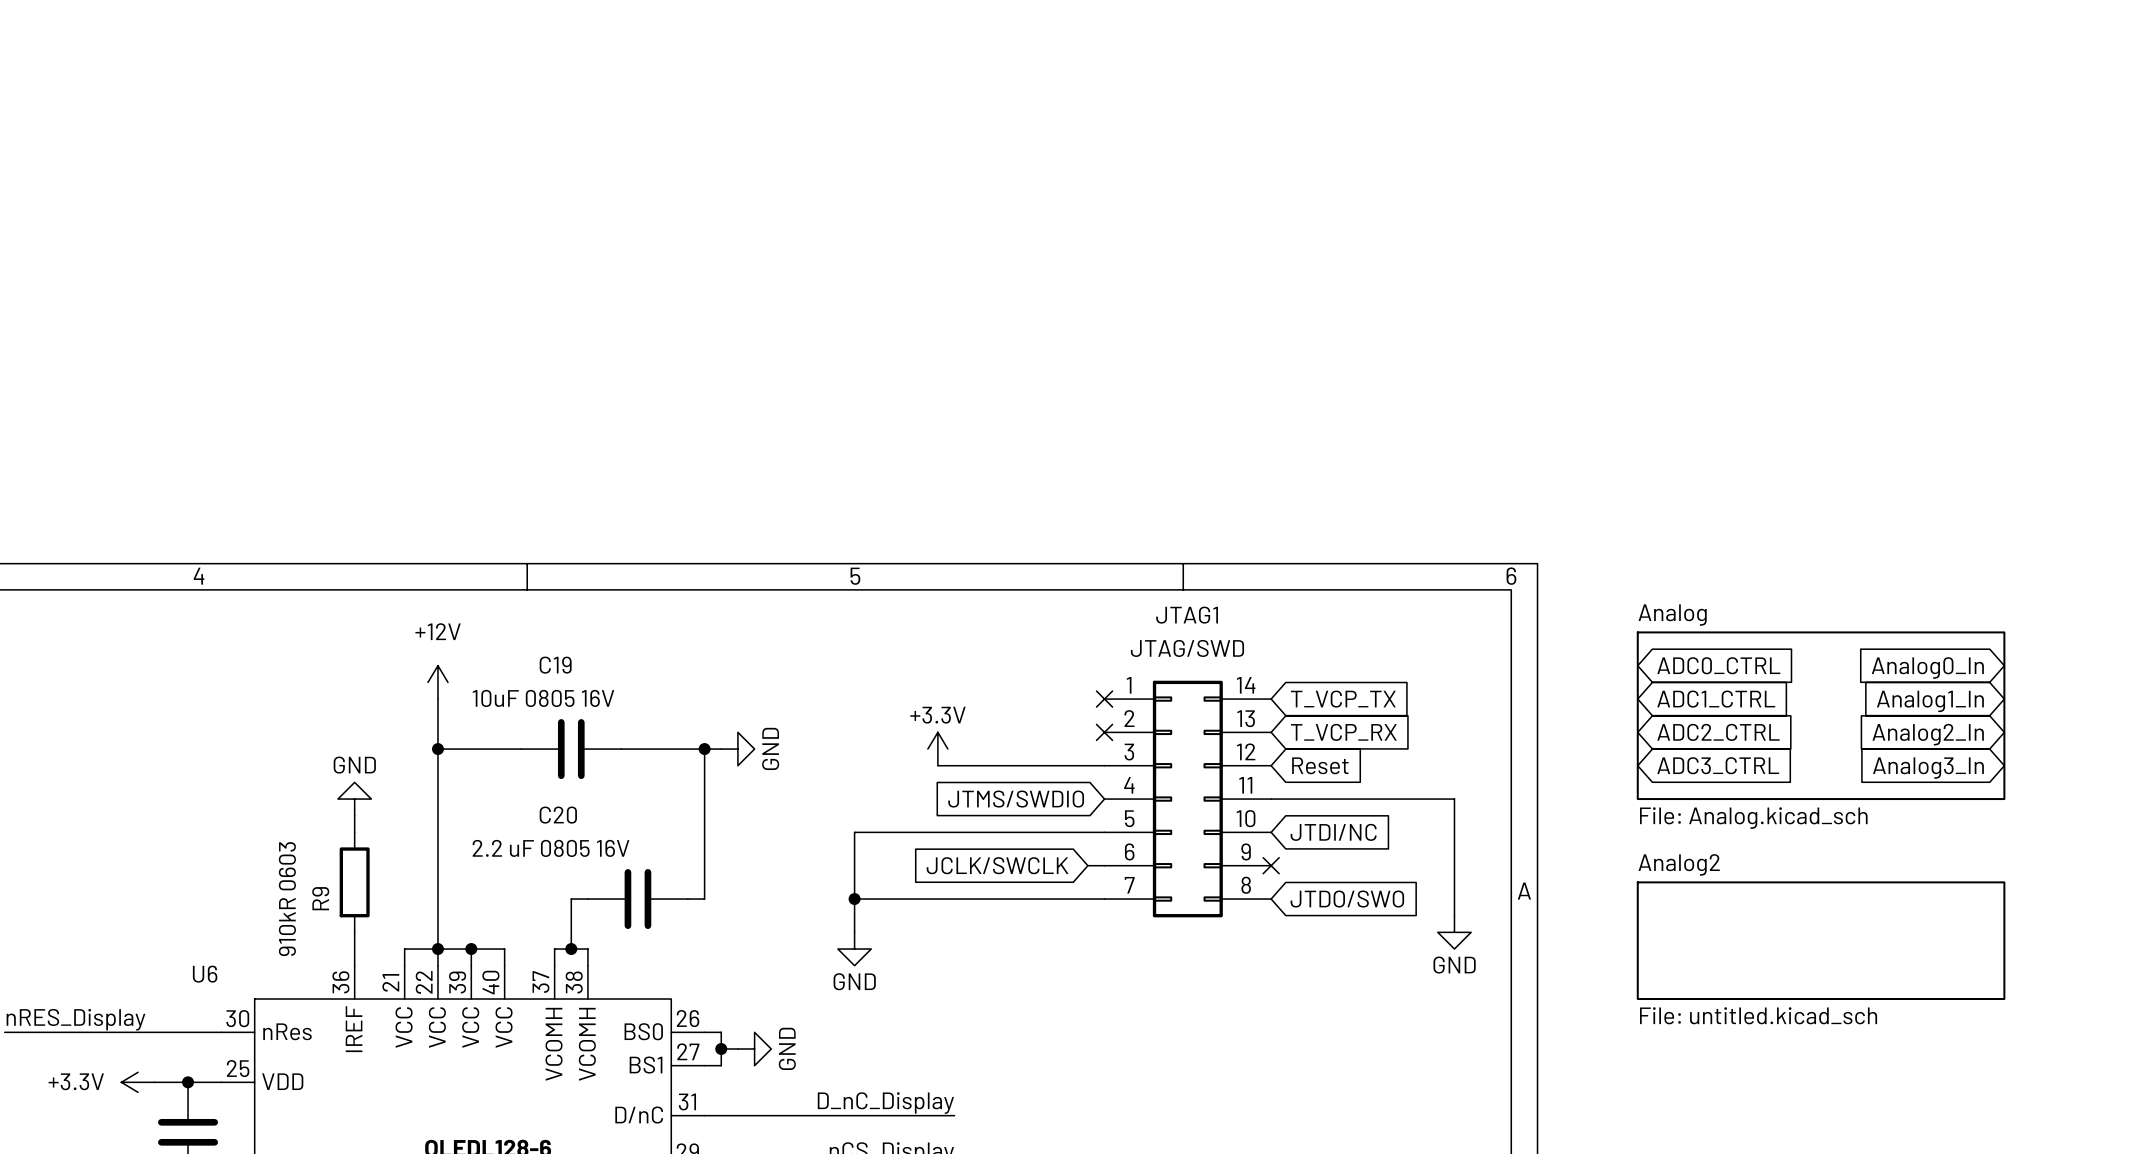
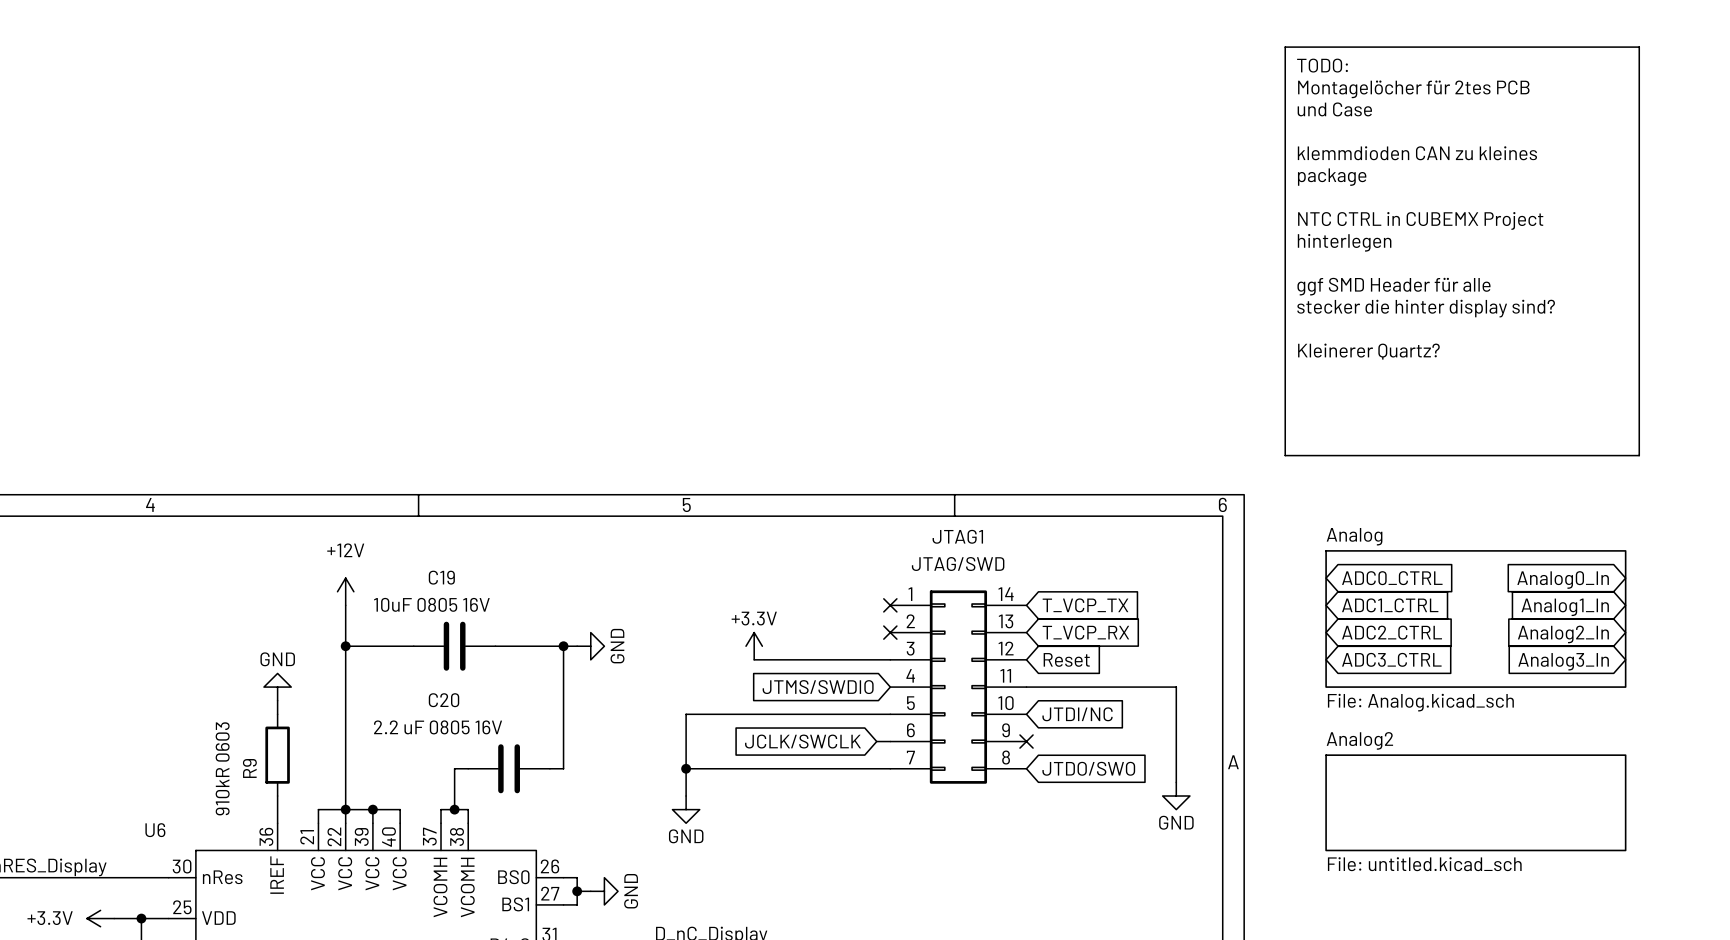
line: none -> (1285, 47) (1639, 47) (1639, 455) (1285, 455) (1285, 47)
text: none -> TODO: (1322, 65)
text: none -> Montagelöcher für 2tes PCB (1413, 89)
text: none -> und Case (1334, 109)
text: none -> klemmdioden CAN zu kleines (1417, 153)
text: none -> package (1332, 177)
text: none -> NTC CTRL in CUBEMX Project (1420, 220)
text: none -> hinterlegen (1344, 242)
text: none -> ggf SMD Header für alle (1393, 286)
text: none -> stecker die hinter display sind? (1426, 308)
text: none -> Kleinerer Quartz? (1368, 351)

